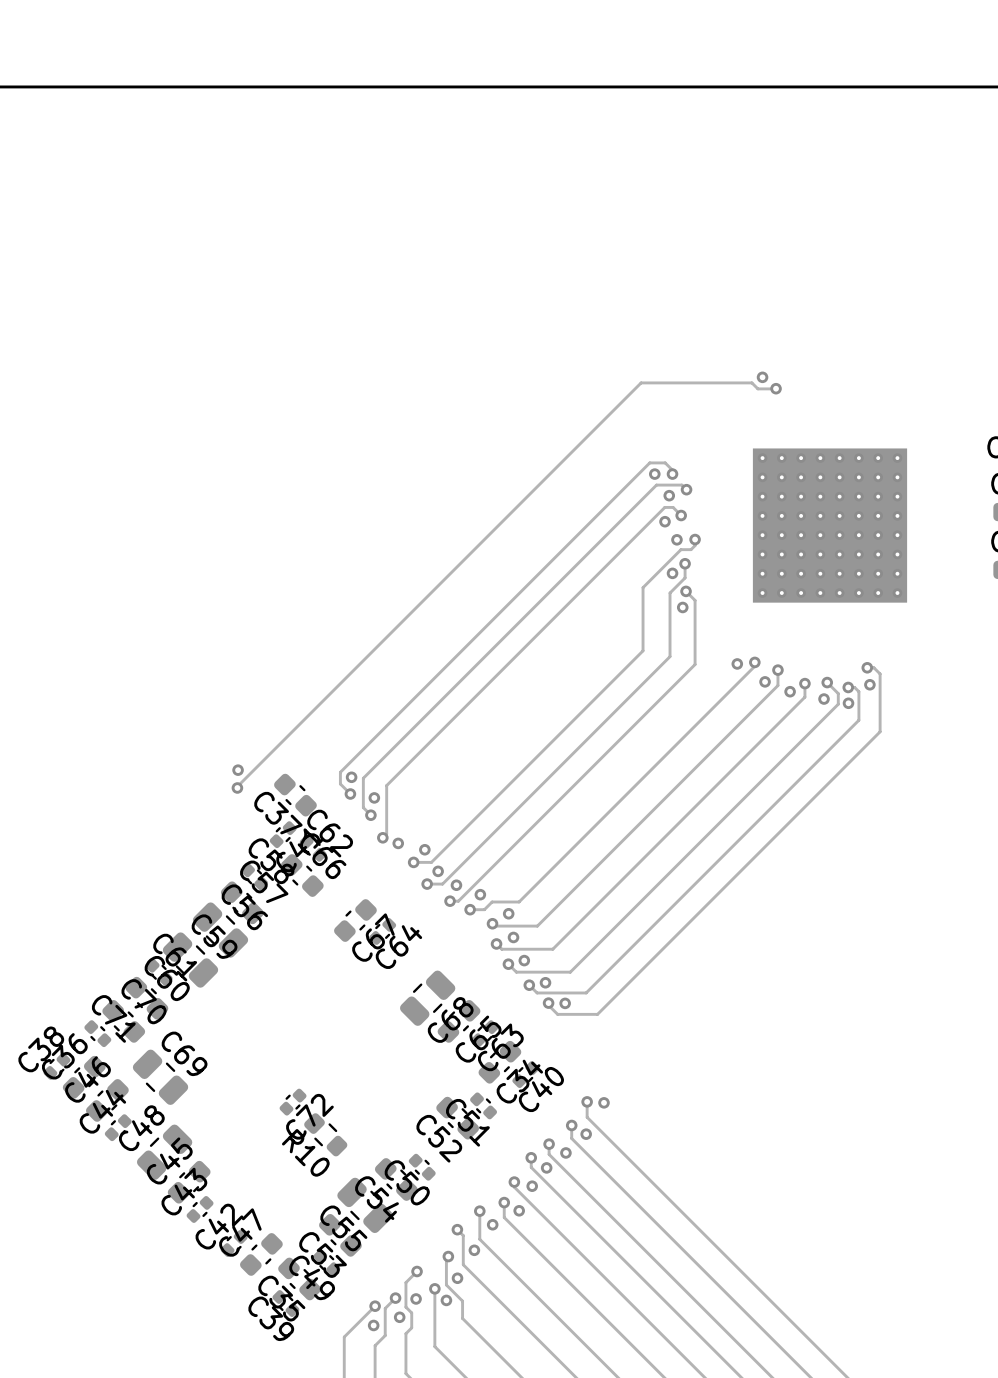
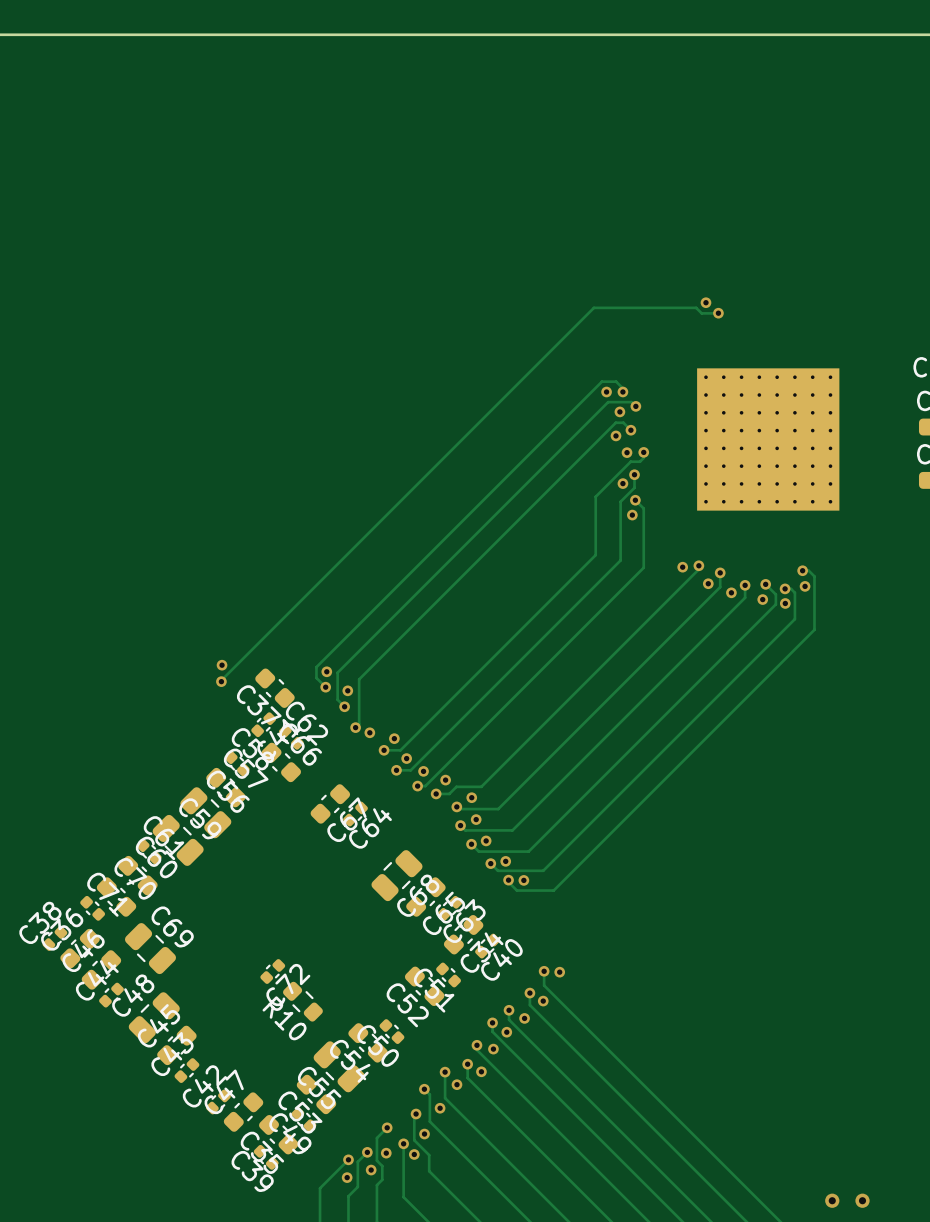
via: none -> (832, 1200)
via: none -> (862, 1200)

